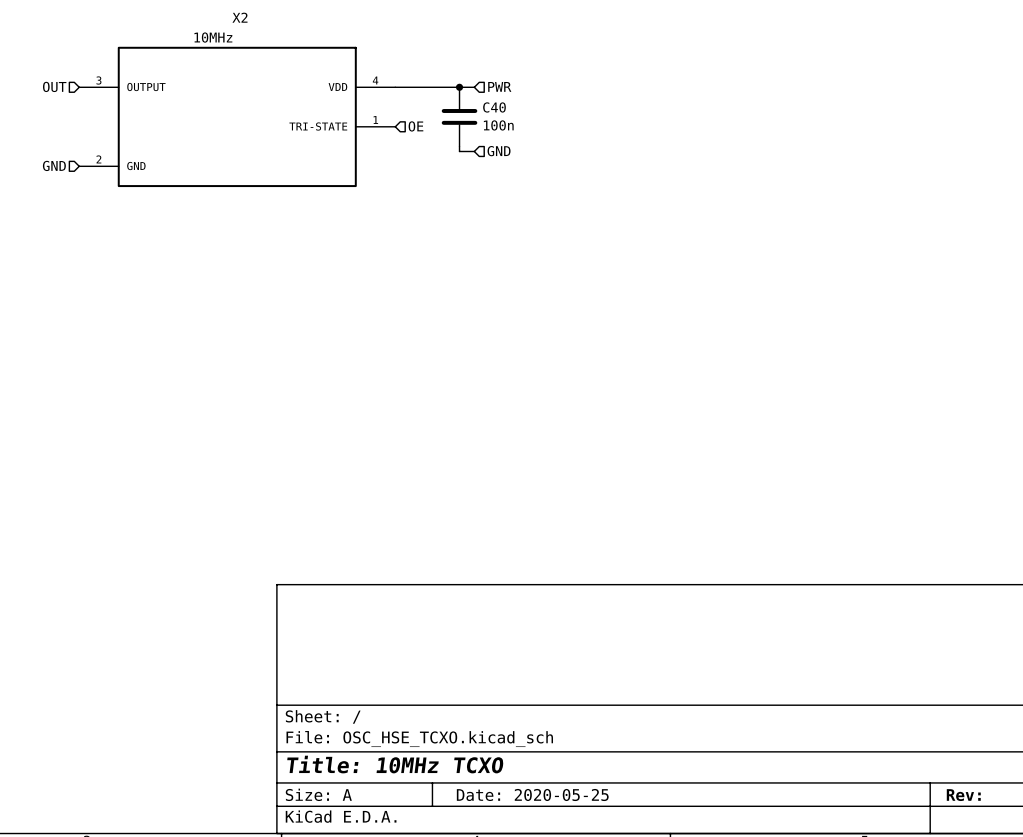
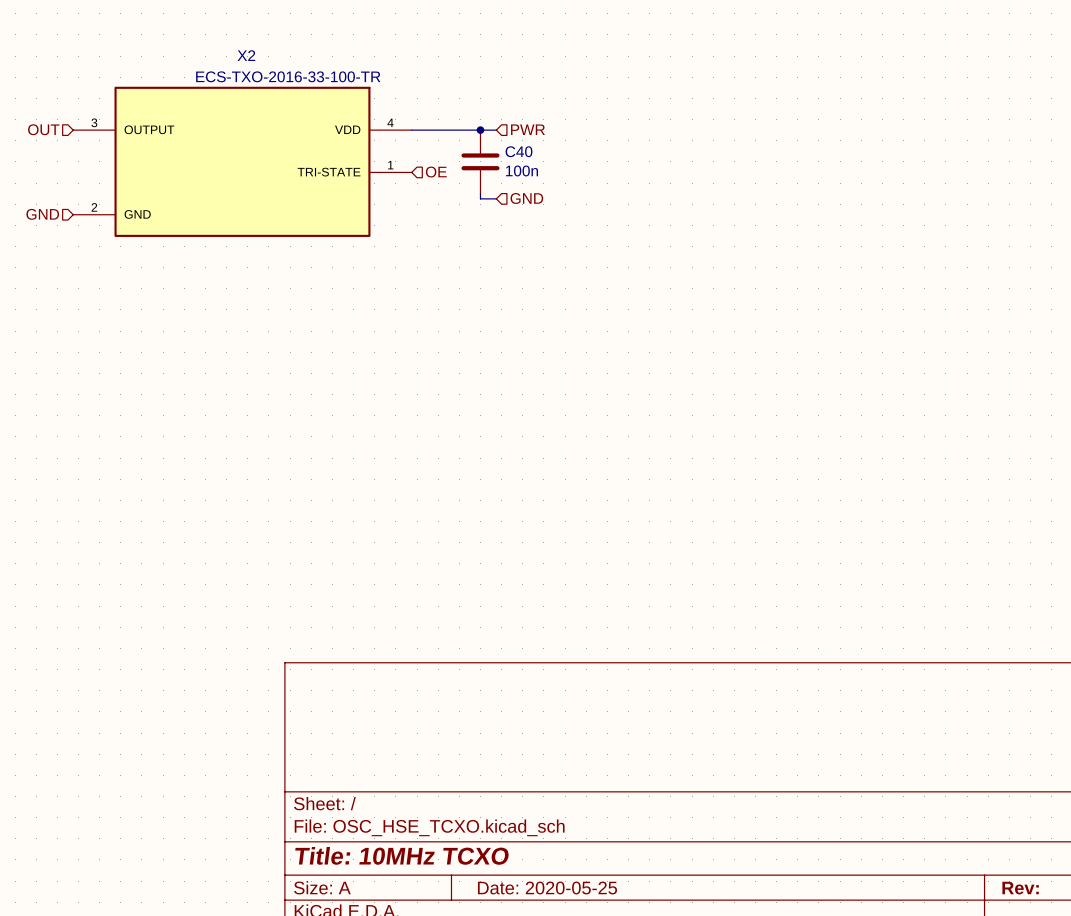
X2 value: 10MHz (213, 37) -> ECS-TXO-2016-33-100-TR (288, 76)

